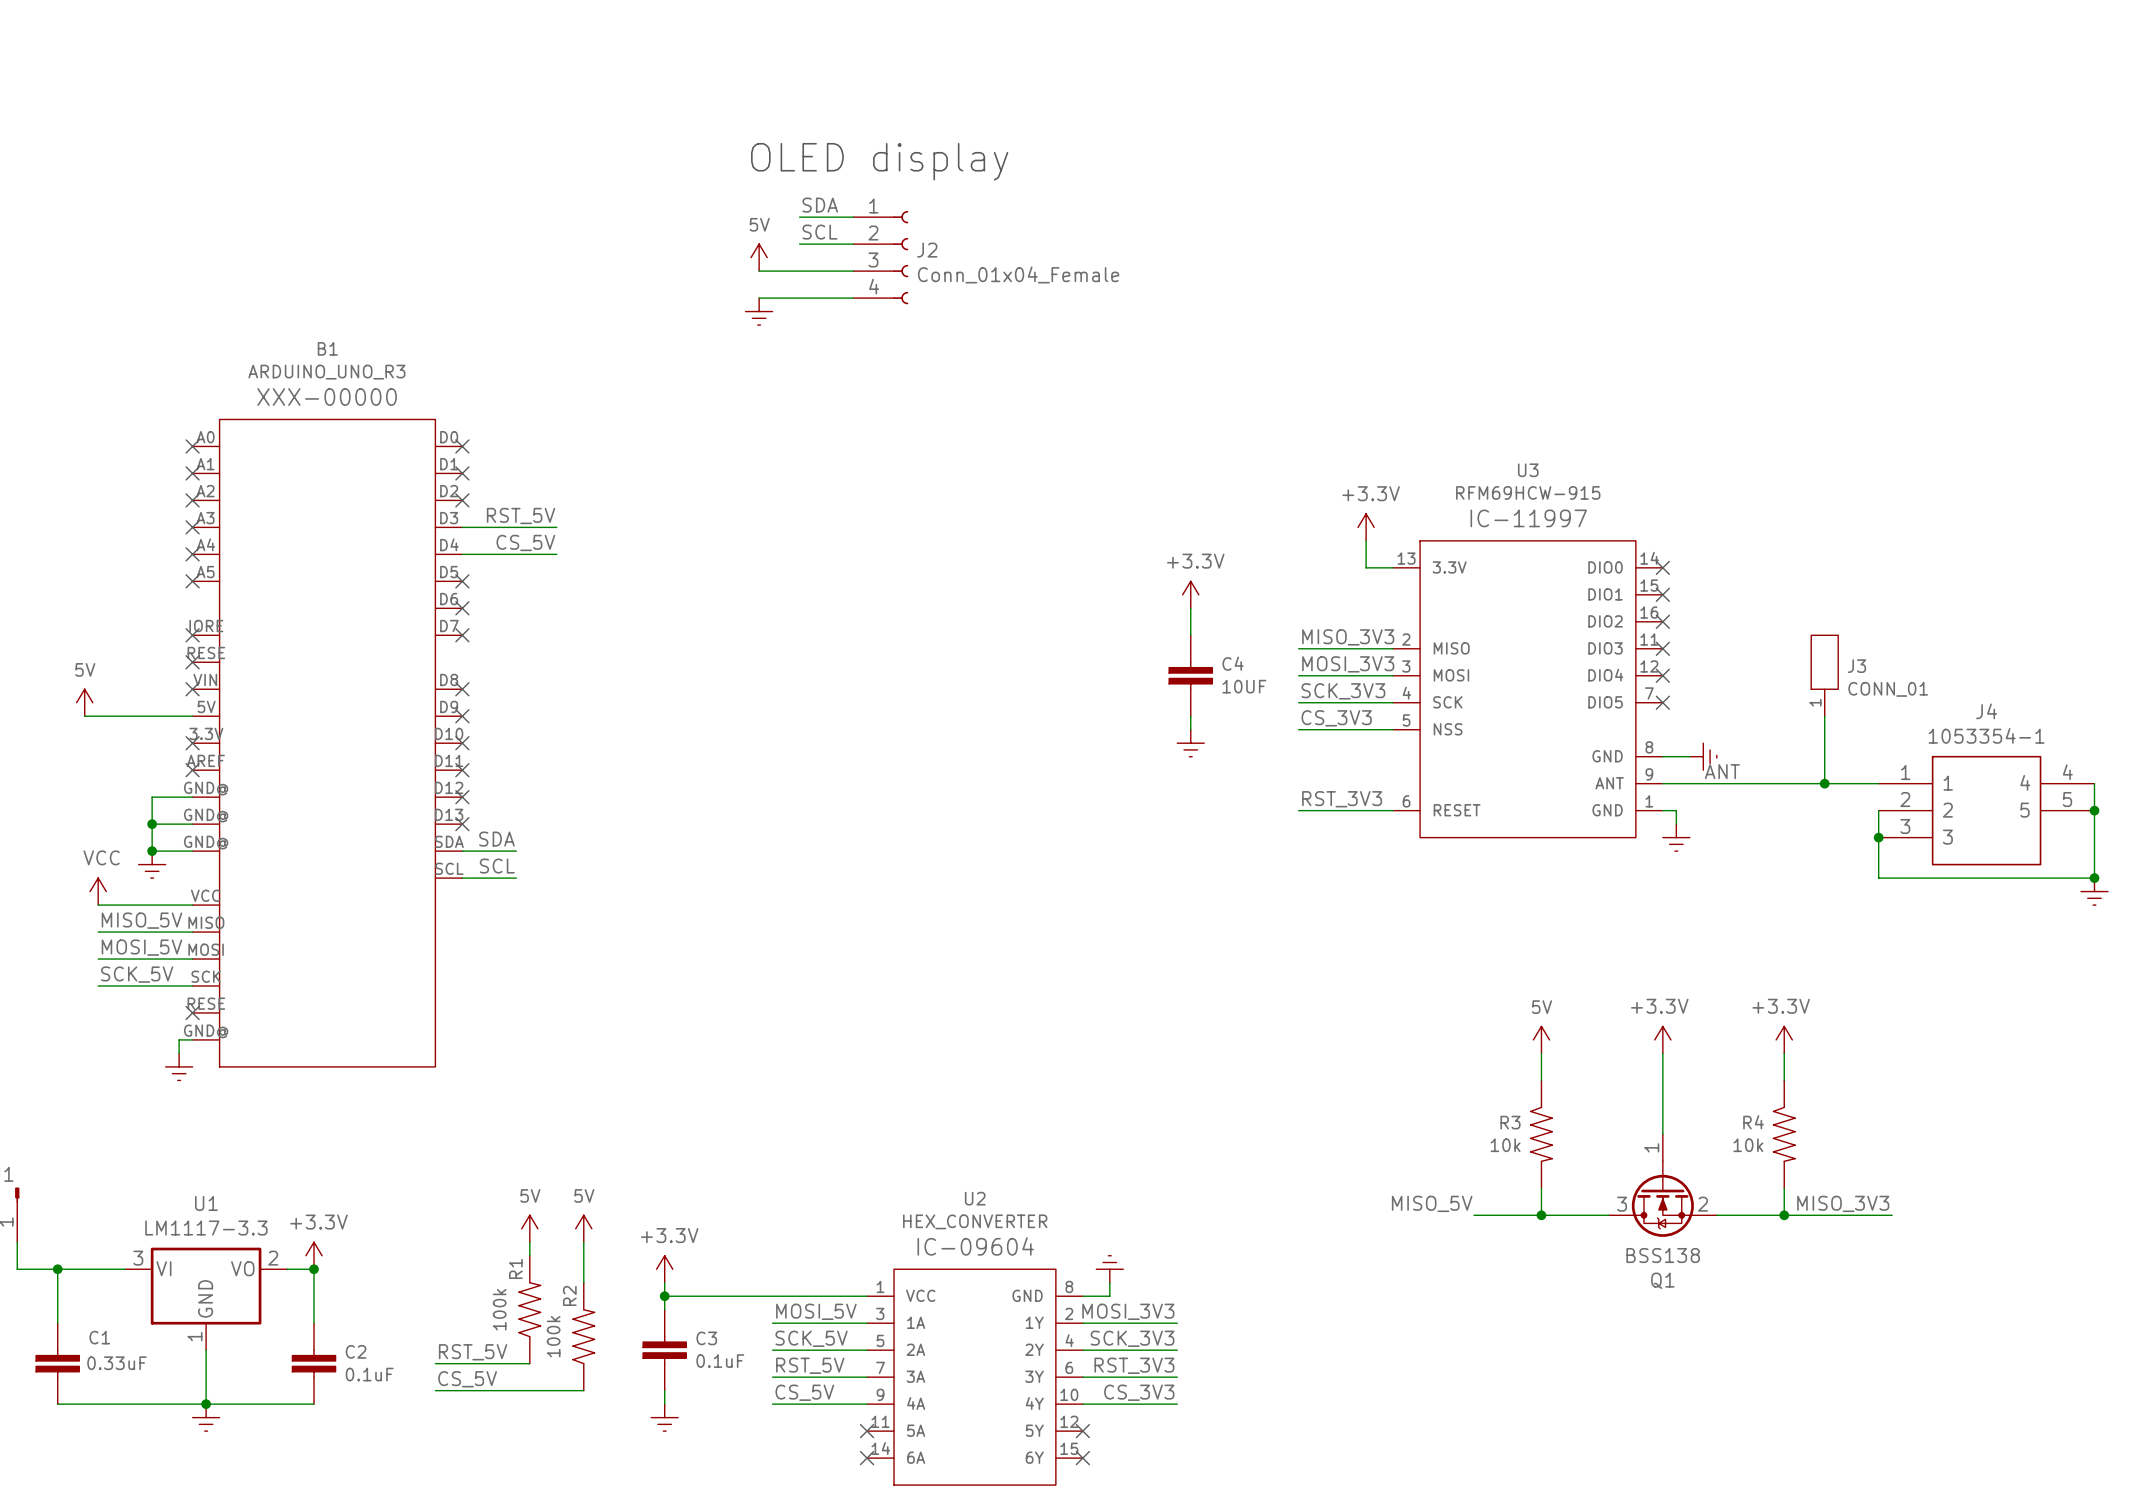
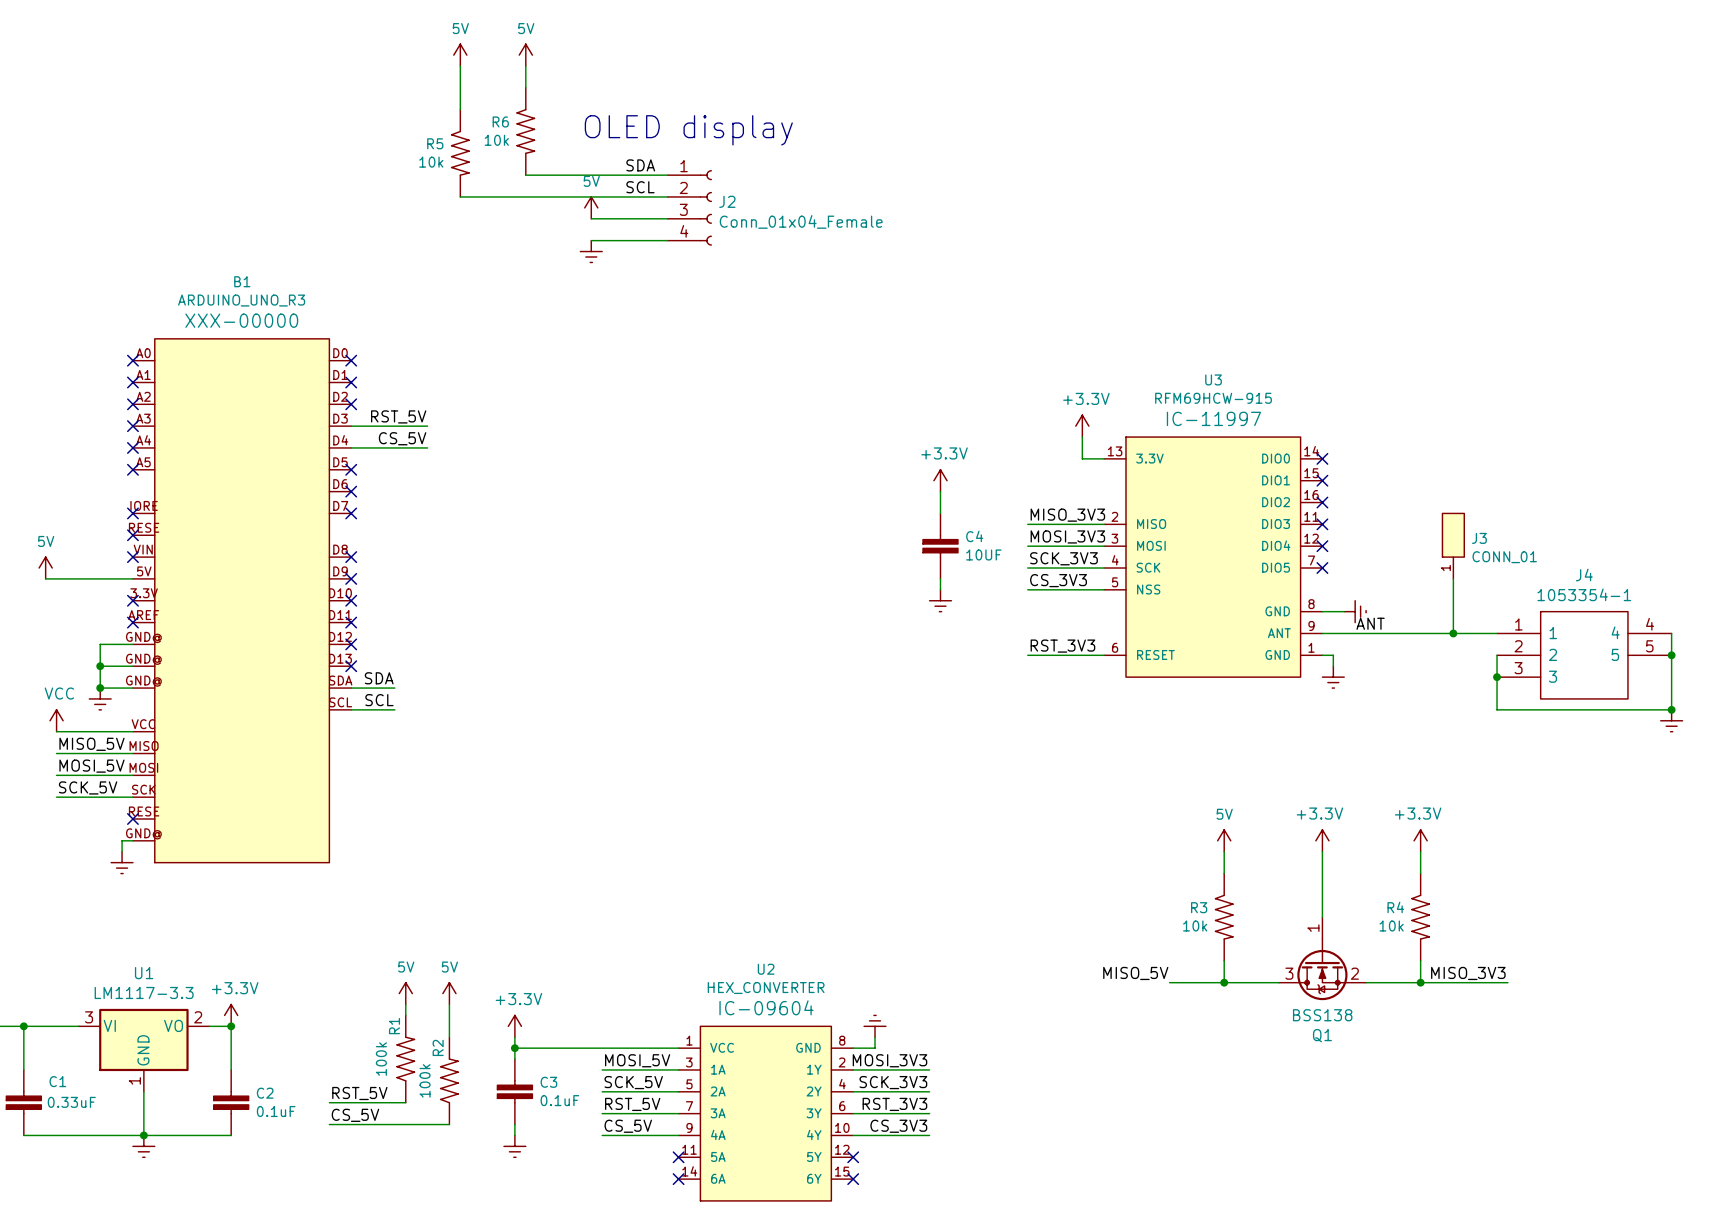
power symbol: none -> 5V (460, 55)
power symbol: none -> 5V (525, 55)
wire: none -> (460, 66) (460, 109)
wire: none -> (525, 66) (525, 87)
R6: none -> 10k (525, 131)
R5: none -> 10k (460, 153)
wire: none -> (525, 175) (624, 175)
wire: none -> (460, 196) (624, 196)

